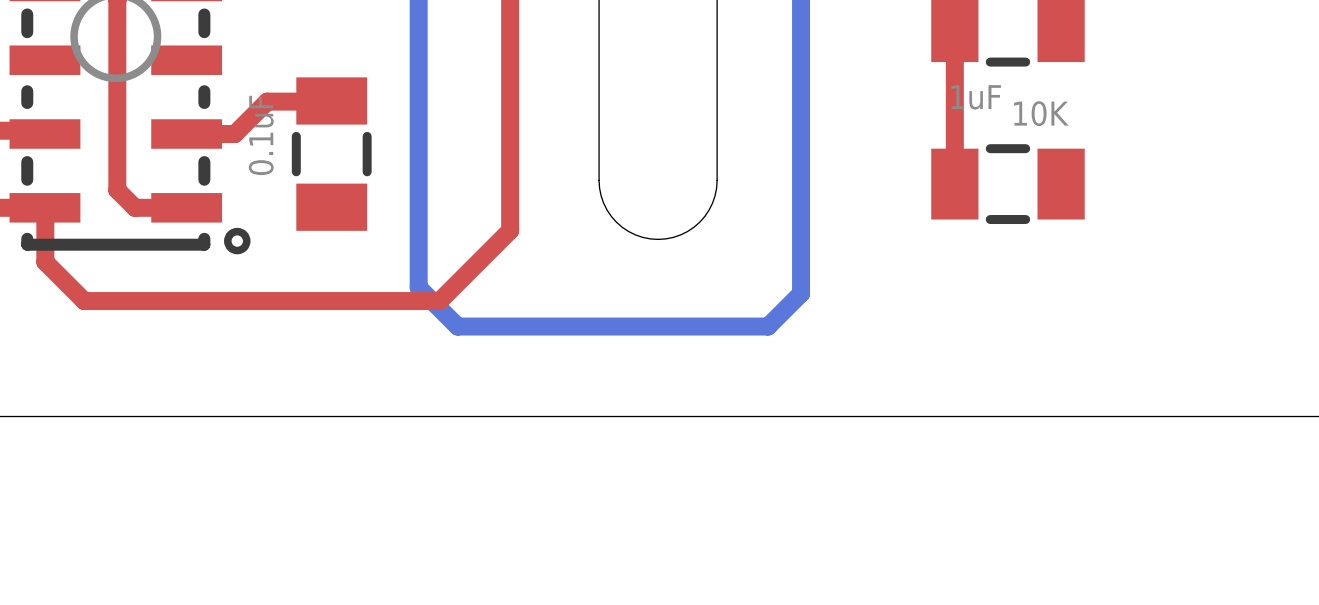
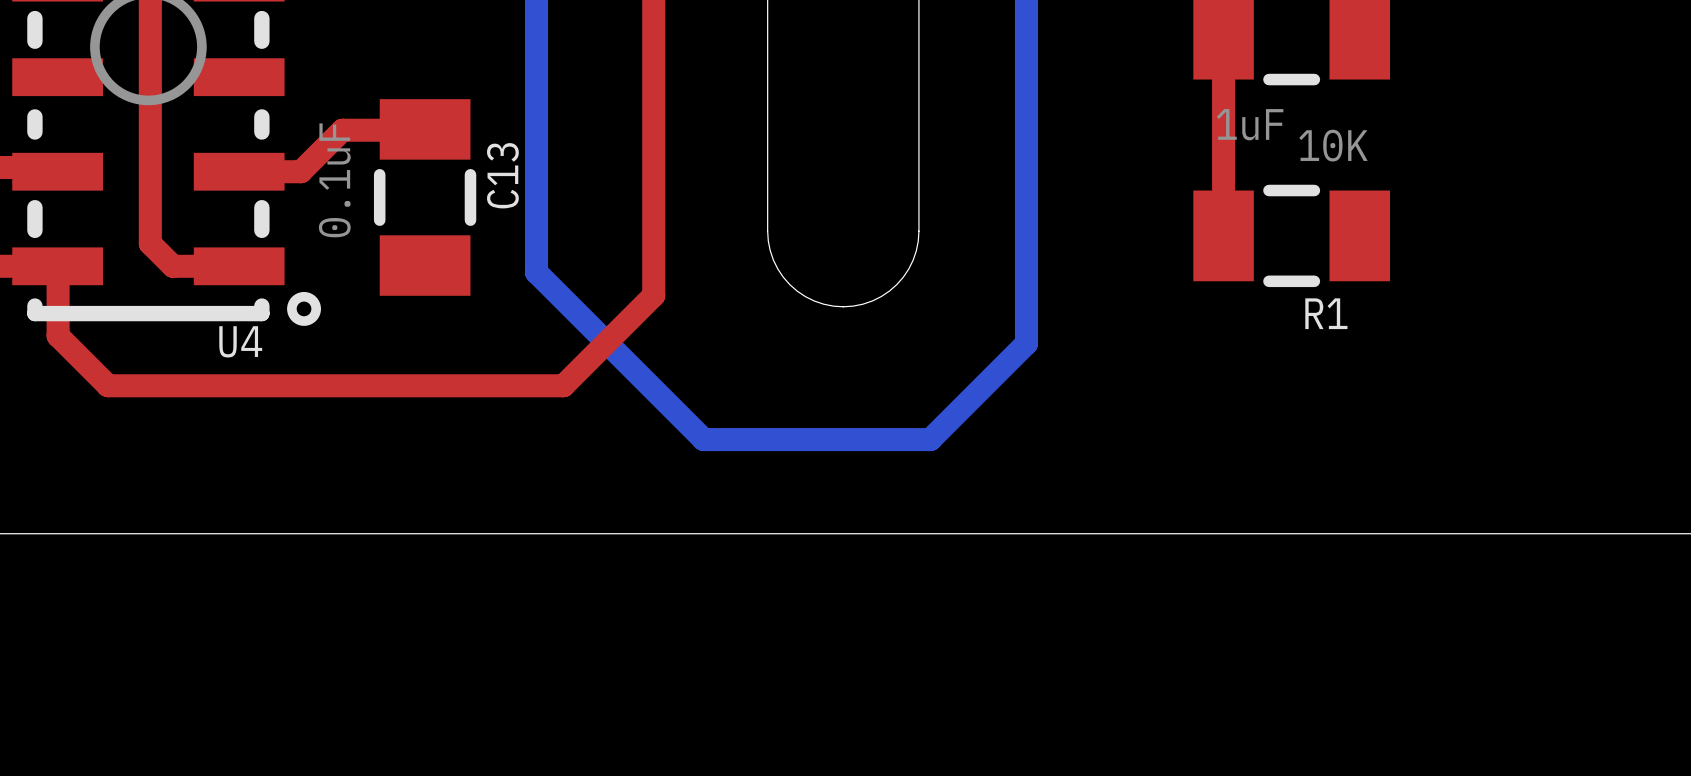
C13 name: none -> C13 (502, 175)
bottom track: (418, 212) (418, 287) (457, 326) (768, 326) (801, 293) (801, 268) -> (536, 272) (703, 439) (930, 439) (1026, 343)
R1 name: none -> R1 (1326, 313)
U4 name: none -> U4 (240, 341)

